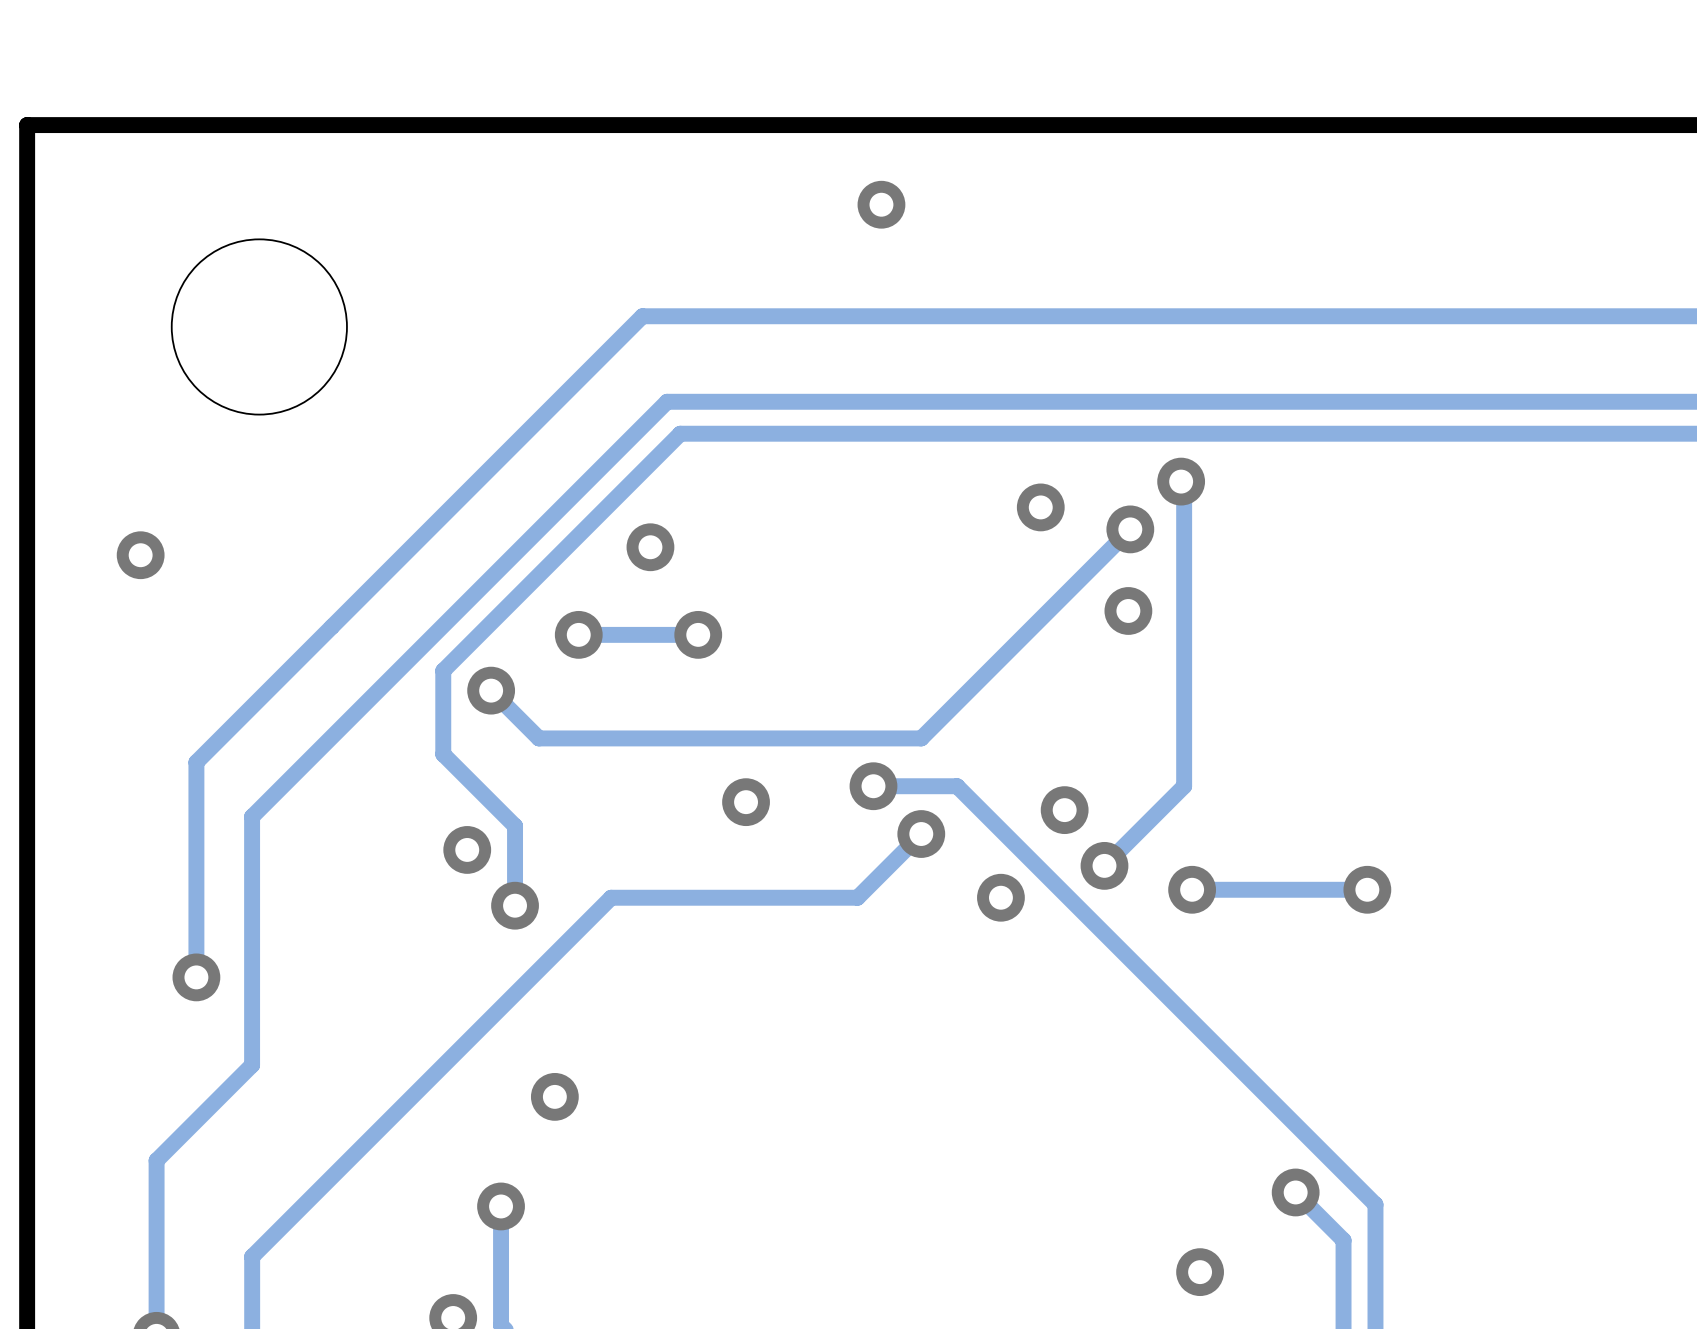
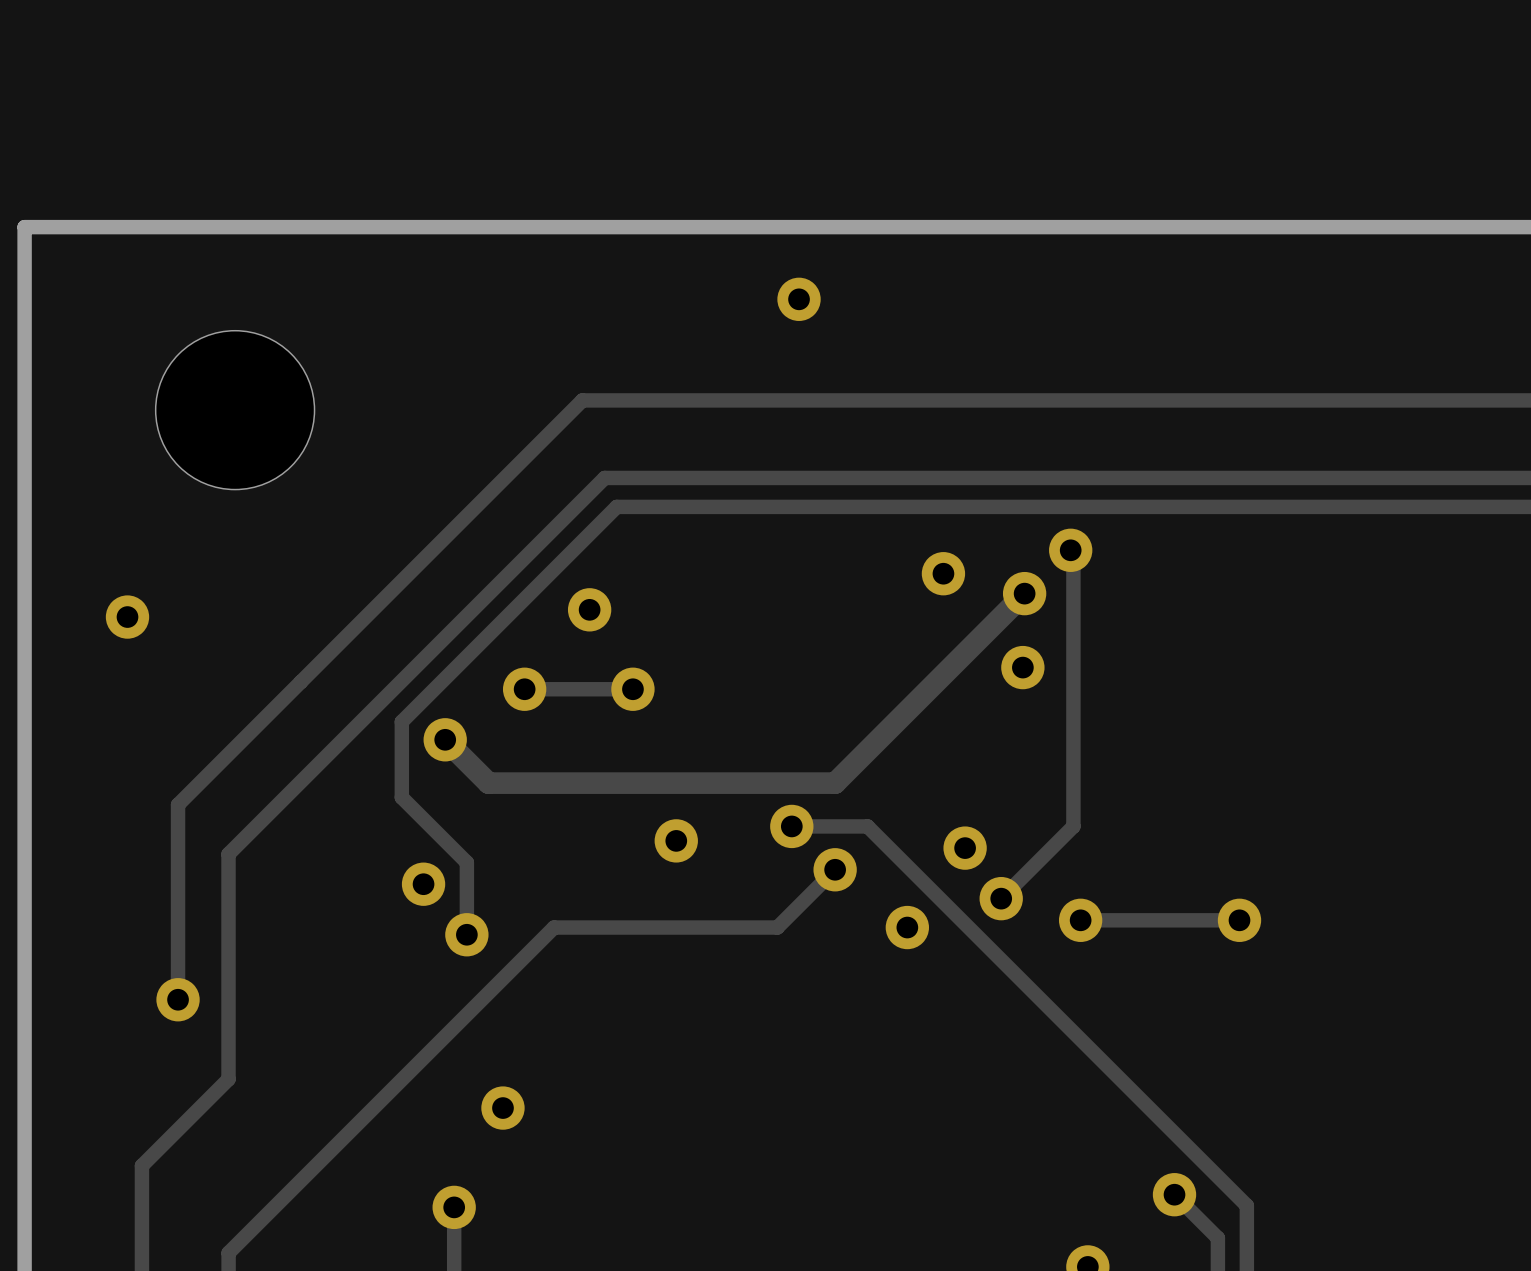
track width: thin (1130, 529) (921, 738) (538, 738) (491, 690) -> thick (1024, 593) (835, 783) (488, 783) (445, 739)

